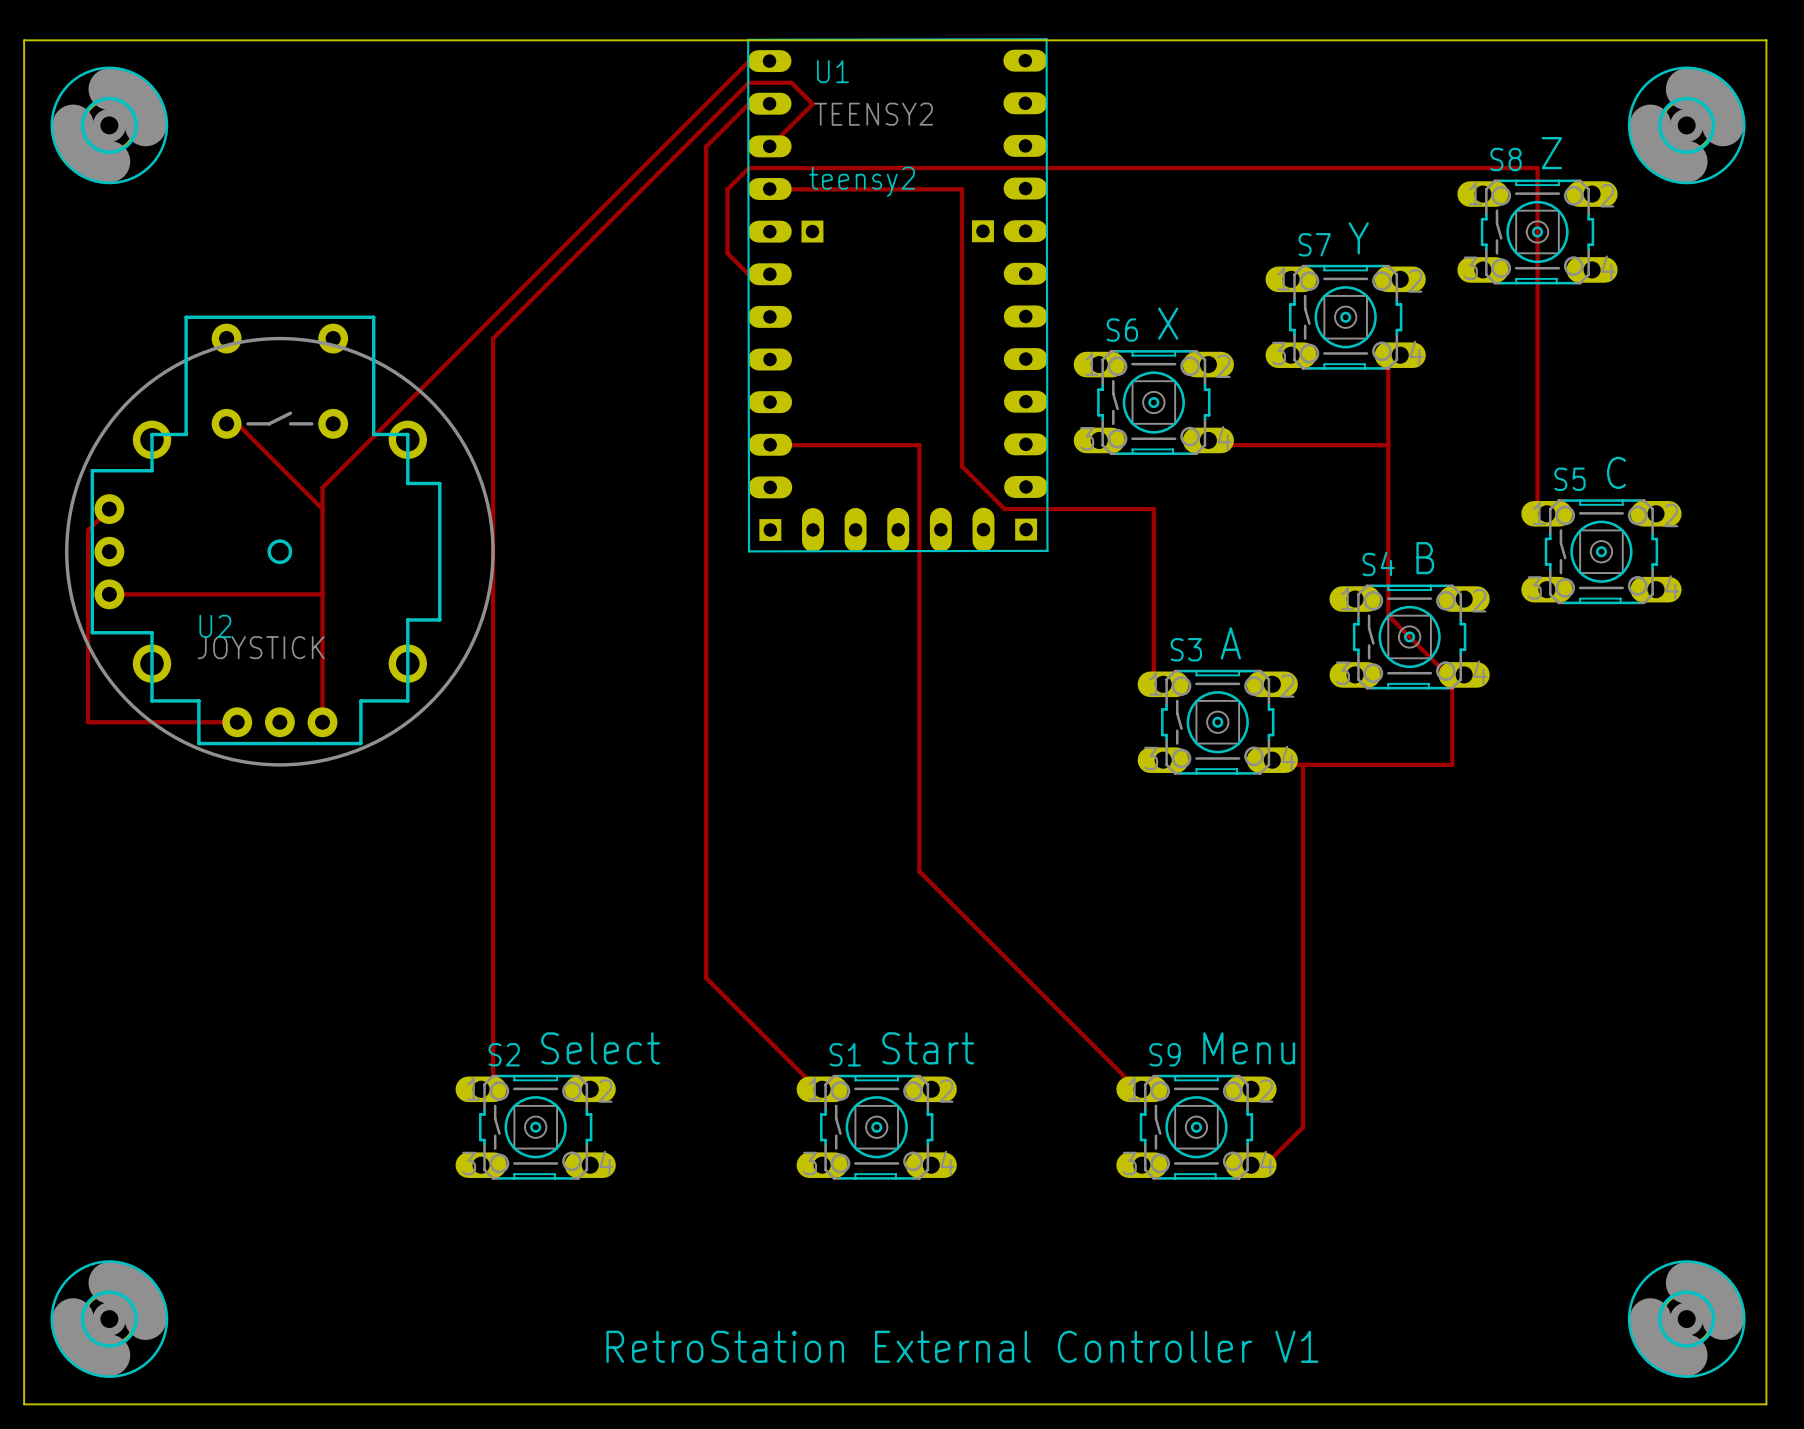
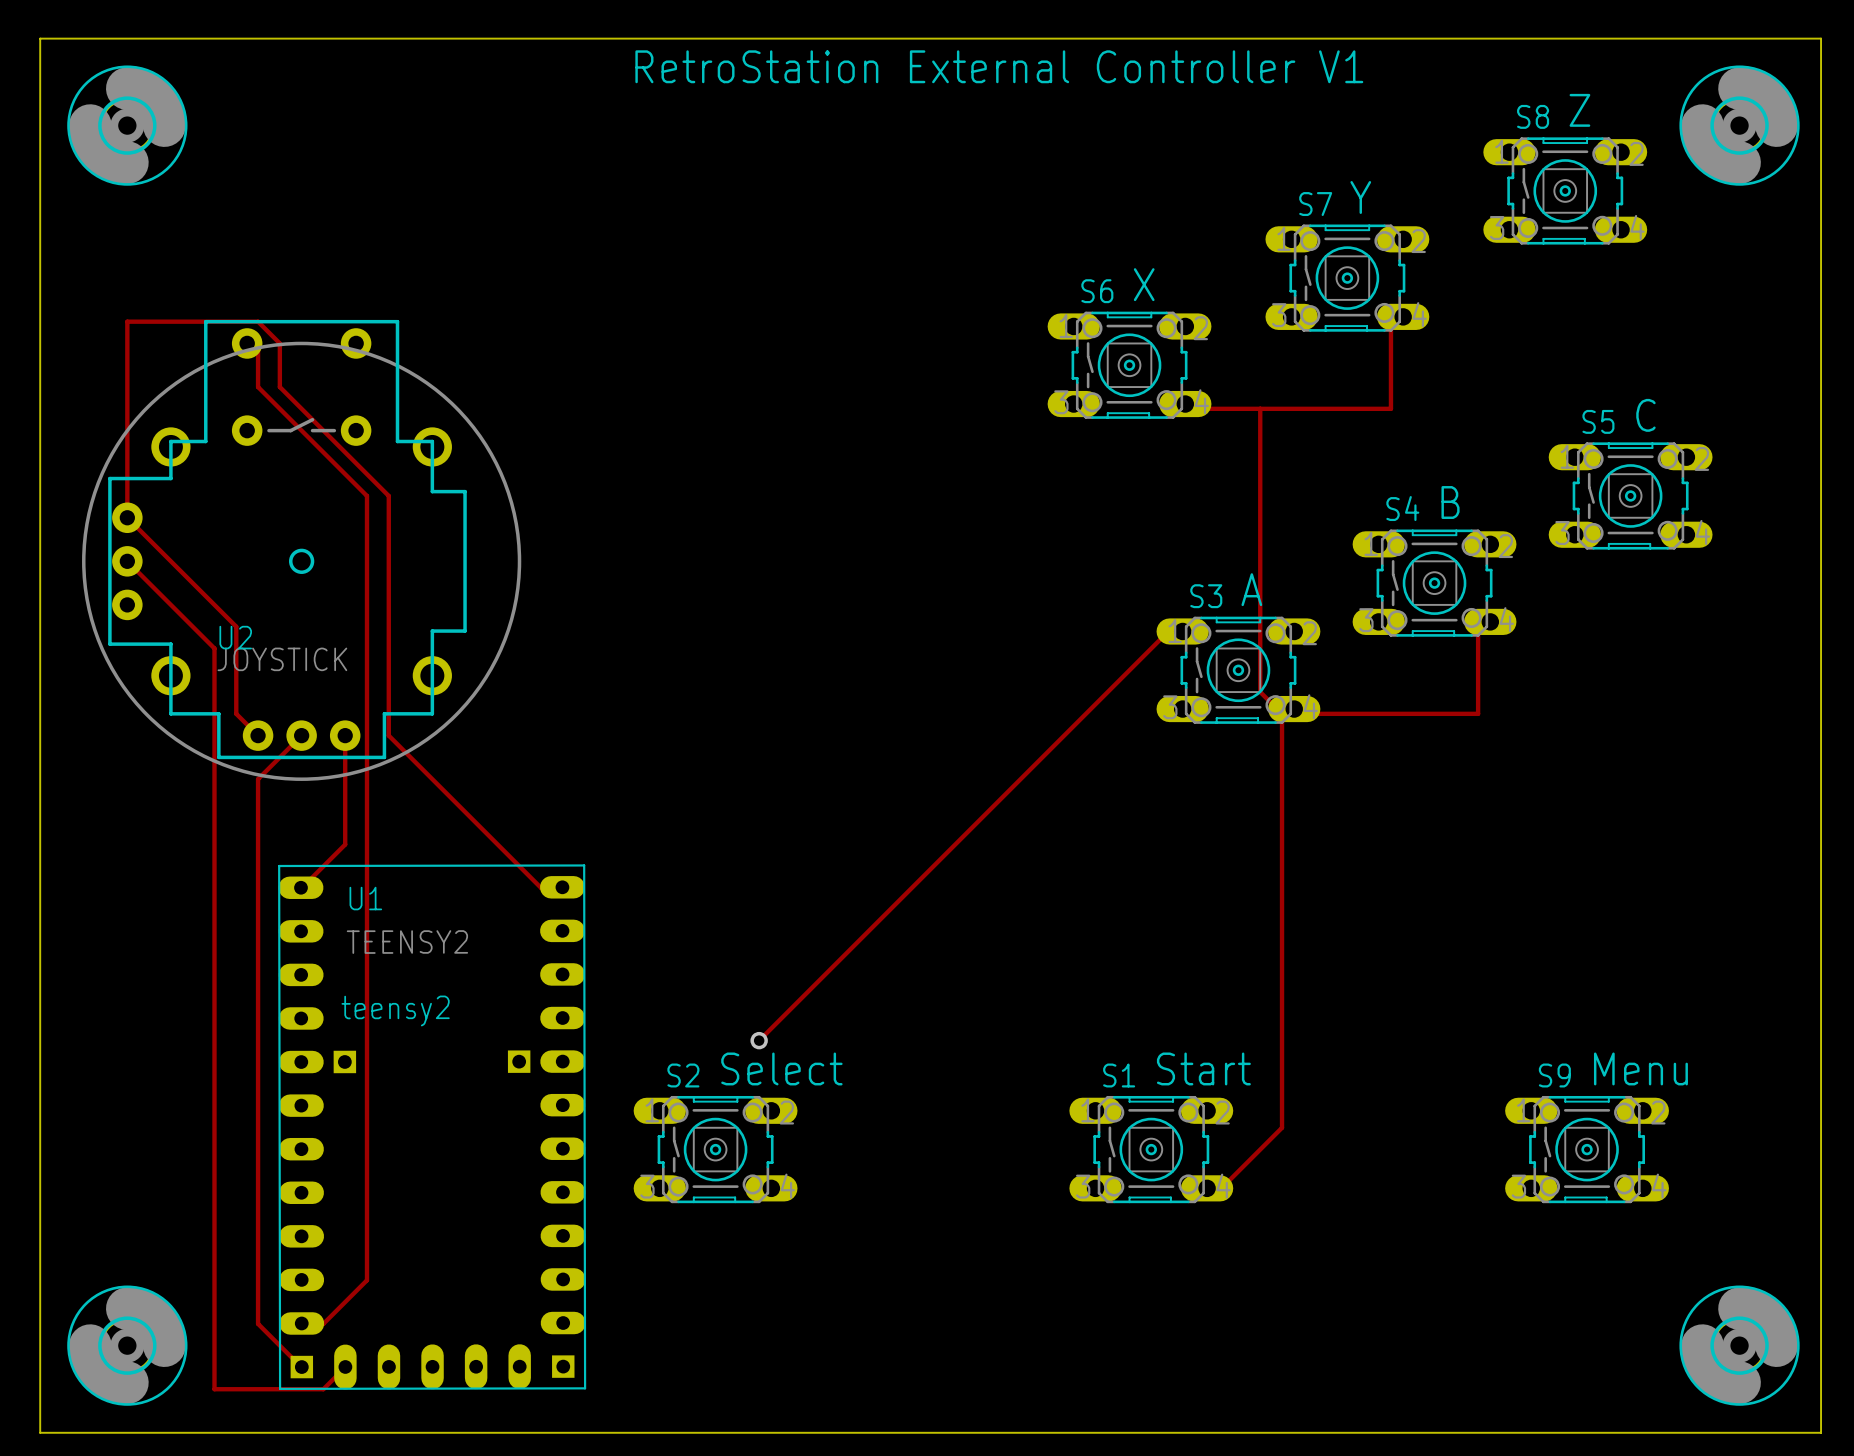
track: (769, 61) (748, 61) (322, 487) (322, 722) -> (300, 887) (345, 844) (345, 735)
text: none -> RetroStation External Controller V1 (999, 66)
track: (769, 103) (748, 104) (706, 146) (706, 978) (812, 1084) (822, 1089) -> none
track: (769, 146) (812, 104) (791, 82) (748, 82) (493, 338) (493, 1084) (481, 1089) -> none
text position: Z (1551, 153) -> Z (1579, 110)
track: (769, 188) (961, 189) (961, 466) (1004, 509) (1153, 509) (1153, 679) (1163, 684) -> none
S8 position: (1537, 231) -> (1565, 190)
text position: Y (1358, 238) -> Y (1360, 197)
track: (769, 274) (748, 274) (727, 253) (727, 189) (748, 168) (1537, 168) (1537, 509) (1546, 513) -> none
U1 position: (897, 295) -> (432, 1127)
track: none -> (1403, 316) (1390, 321) (1390, 408) (1194, 408) (1185, 404)
S7 position: (1345, 317) -> (1347, 278)
text position: X (1168, 323) -> X (1144, 284)
track: none -> (247, 343) (258, 343) (258, 387) (366, 495) (366, 1280) (323, 1323) (301, 1323)
track: (1400, 355) (1388, 359) (1388, 615) (1452, 679) -> none
S6 position: (1153, 402) -> (1129, 365)
track: none -> (1260, 408) (1260, 692) (1282, 713)
track: (226, 423) (237, 423) (322, 509) -> none
track: (1208, 440) (1217, 445) (1388, 445) -> none
track: (770, 444) (919, 445) (919, 871) (1132, 1084) (1141, 1089) -> none
text position: C (1616, 472) -> C (1645, 415)
track: (109, 509) (88, 530) (88, 722) (237, 722) -> (562, 887) (541, 888) (388, 735) (388, 495) (279, 387) (279, 343) (258, 321) (127, 321) (127, 517) (236, 626) (236, 713) (258, 735)
track: none -> (127, 561) (214, 648) (214, 1389) (323, 1389) (345, 1366)
S5 position: (1601, 551) -> (1630, 495)
text position: B (1425, 558) -> B (1450, 502)
track: (109, 594) (322, 594) -> none
track: none -> (1490, 621) (1478, 626) (1478, 713) (1303, 713) (1294, 709) (1282, 713)
track: none -> (1182, 631) (1173, 626) (759, 1040)
S4 position: (1409, 636) -> (1434, 583)
text position: A (1230, 643) -> A (1251, 589)
track: (1452, 679) (1452, 764) (1281, 764) (1272, 760) -> none
track: none -> (1282, 713) (1282, 1127) (1216, 1193) (1207, 1188)
track: none -> (301, 735) (258, 779) (258, 1323) (301, 1367)
S3 position: (1217, 722) -> (1238, 670)
track: (1303, 764) (1303, 1127) (1260, 1169) (1251, 1165) -> none
via: none -> (759, 1040)
text position: Select (600, 1048) -> Select (781, 1068)
text position: Start (928, 1048) -> Start (1203, 1068)
text position: Menu (1249, 1048) -> Menu (1640, 1068)
S2 position: (535, 1127) -> (715, 1149)
S1 position: (876, 1127) -> (1151, 1149)
S9 position: (1196, 1127) -> (1587, 1149)
text: RetroStation External Controller V1 (962, 1346) -> none

